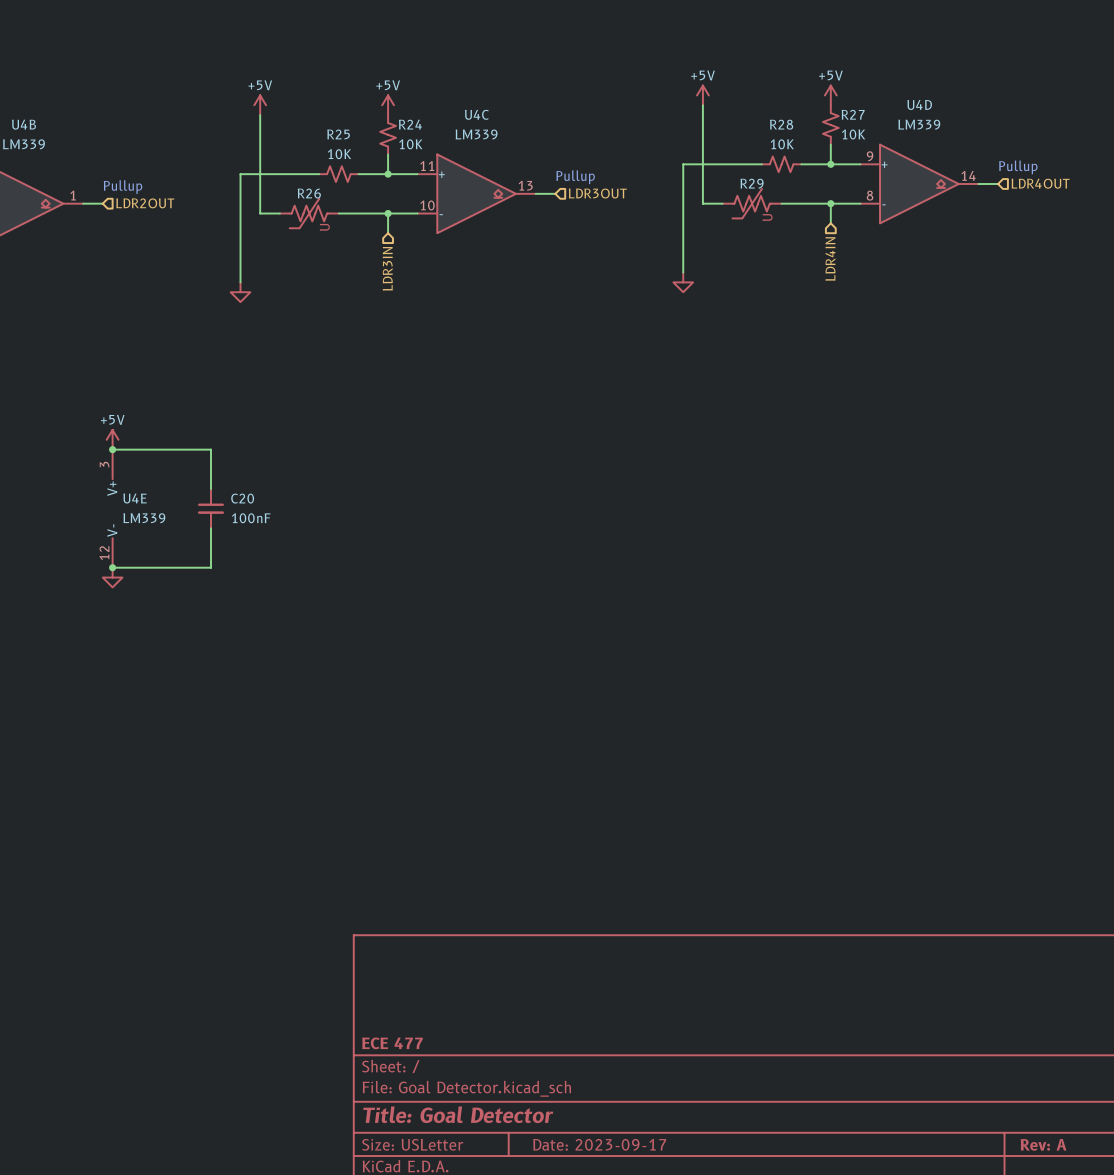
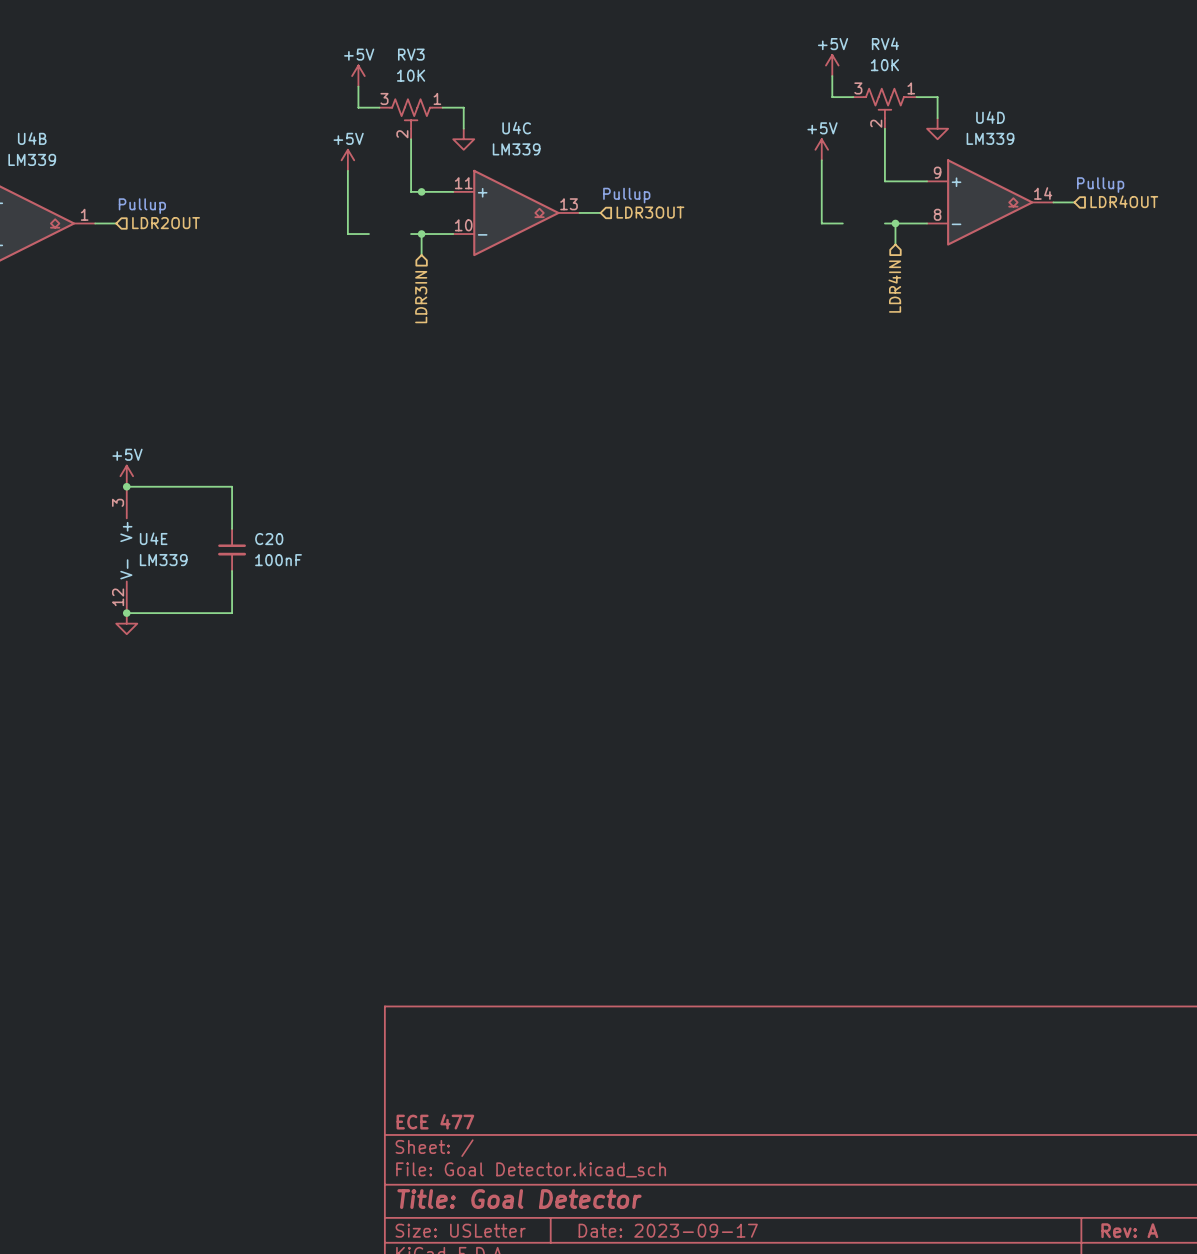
power symbol: none -> +5V (832, 65)
power symbol: none -> +5V (358, 76)
wire: none -> (832, 76) (832, 97) (853, 97)
wire: none -> (358, 86) (358, 107) (379, 107)
wire: none -> (916, 97) (937, 97) (937, 118)
wire: none -> (442, 107) (463, 107) (463, 128)
power symbol: +5V (702, 95) -> none
power symbol: +5V (830, 95) -> none
RV4: none -> 10K (884, 108)
power symbol: +5V (260, 105) -> none
power symbol: +5V (388, 105) -> none
wire: (702, 105) (702, 203) (722, 203) -> none
RV3: none -> 10K (411, 119)
wire: (260, 115) (260, 213) (279, 213) -> none
power symbol: none -> (937, 128)
power symbol: none -> (463, 139)
R27: 10K (830, 124) -> none
R24: 10K (388, 134) -> none
power symbol: none -> +5V (821, 149)
power symbol: none -> +5V (347, 160)
wire: (830, 144) (830, 164) -> none
wire: (388, 154) (388, 174) -> none
wire: (761, 164) (683, 164) (683, 272) -> none
R28: 10K (781, 164) -> none
wire: (801, 164) (820, 164) -> (884, 128) (884, 181)
junction: (830, 164) -> none
wire: (319, 174) (240, 174) (240, 282) -> none
R25: 10K (338, 174) -> none
wire: (358, 174) (378, 174) -> (411, 139) (411, 191)
R29: (752, 203) -> none
wire: (781, 203) (820, 203) -> (842, 223) (821, 223) (821, 160)
R26: (309, 213) -> none
wire: (338, 213) (378, 213) -> (368, 234) (347, 234) (347, 170)
power symbol: (683, 282) -> none
power symbol: (240, 292) -> none

